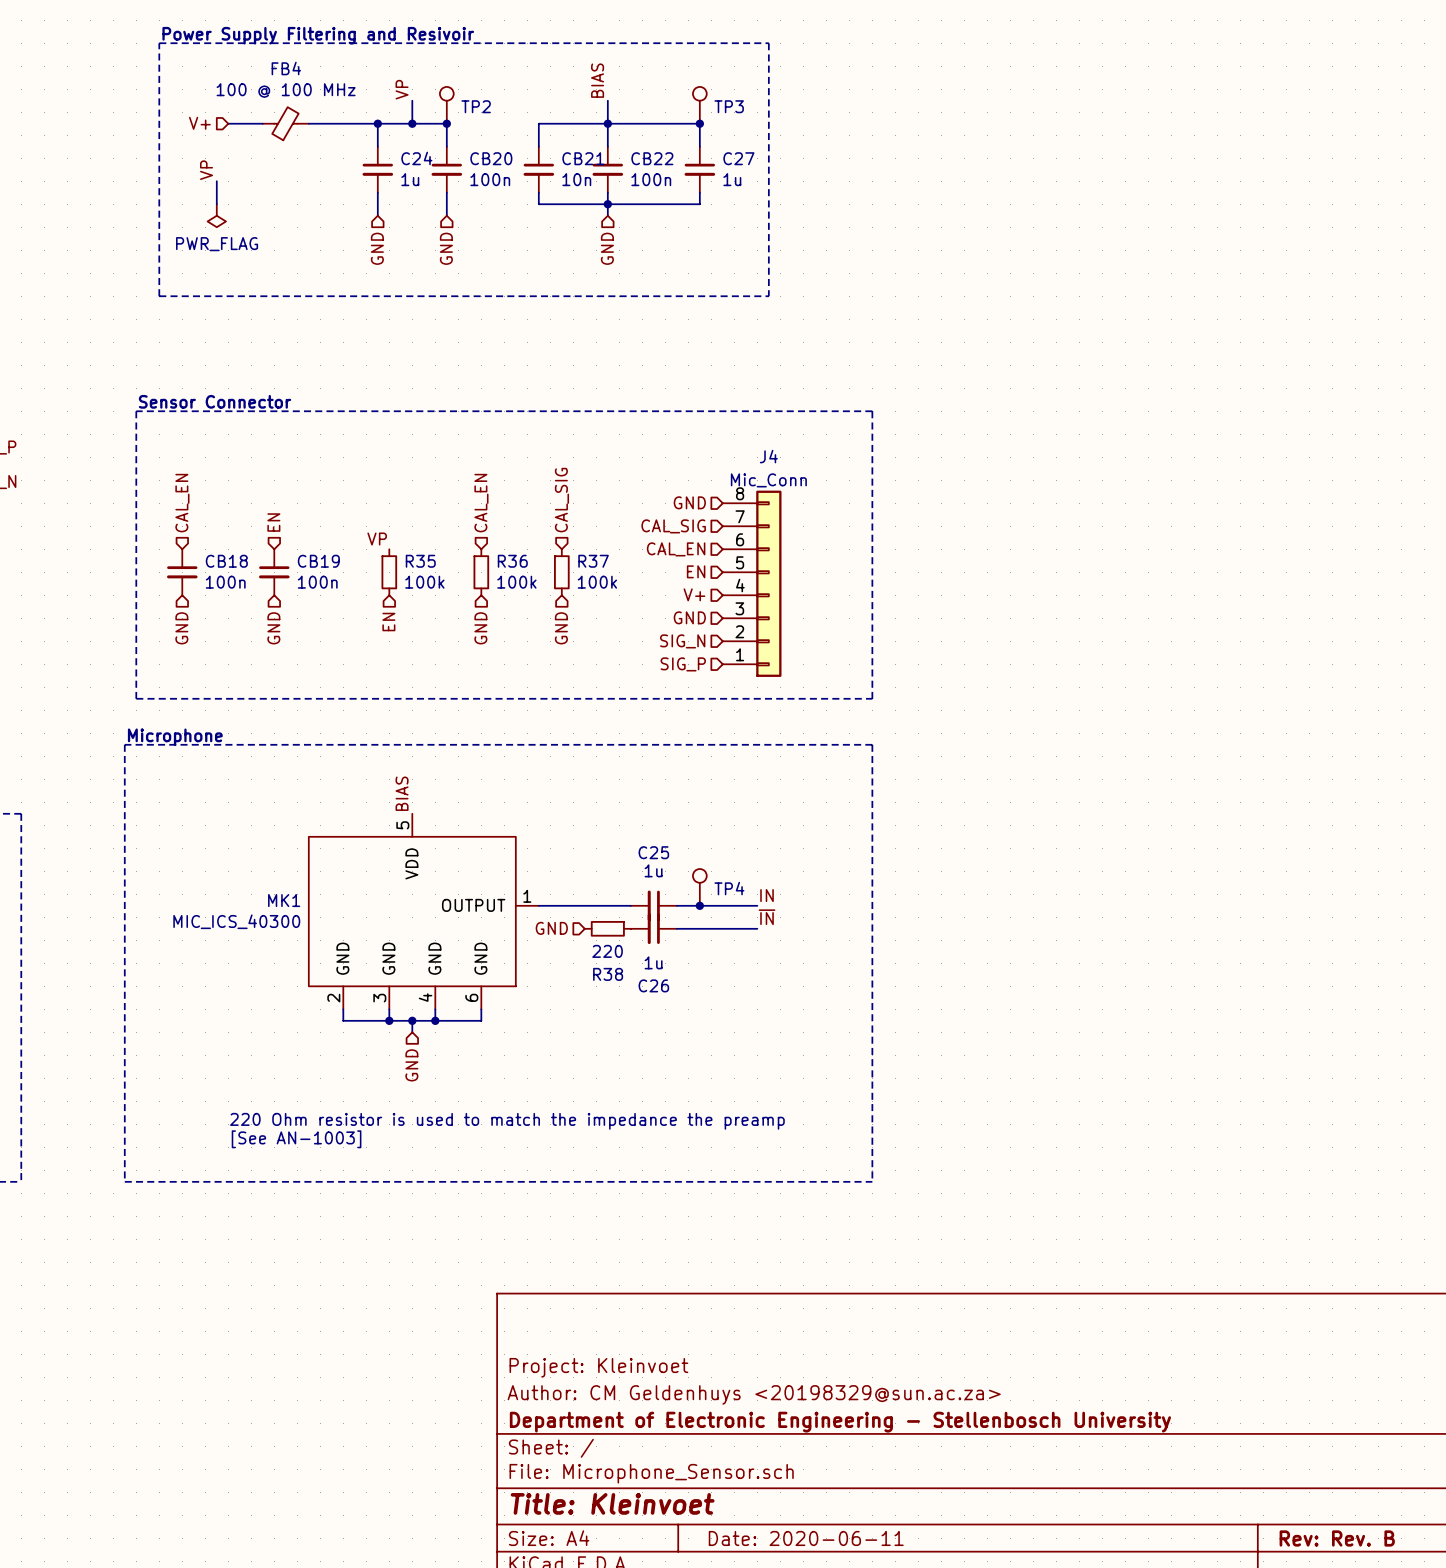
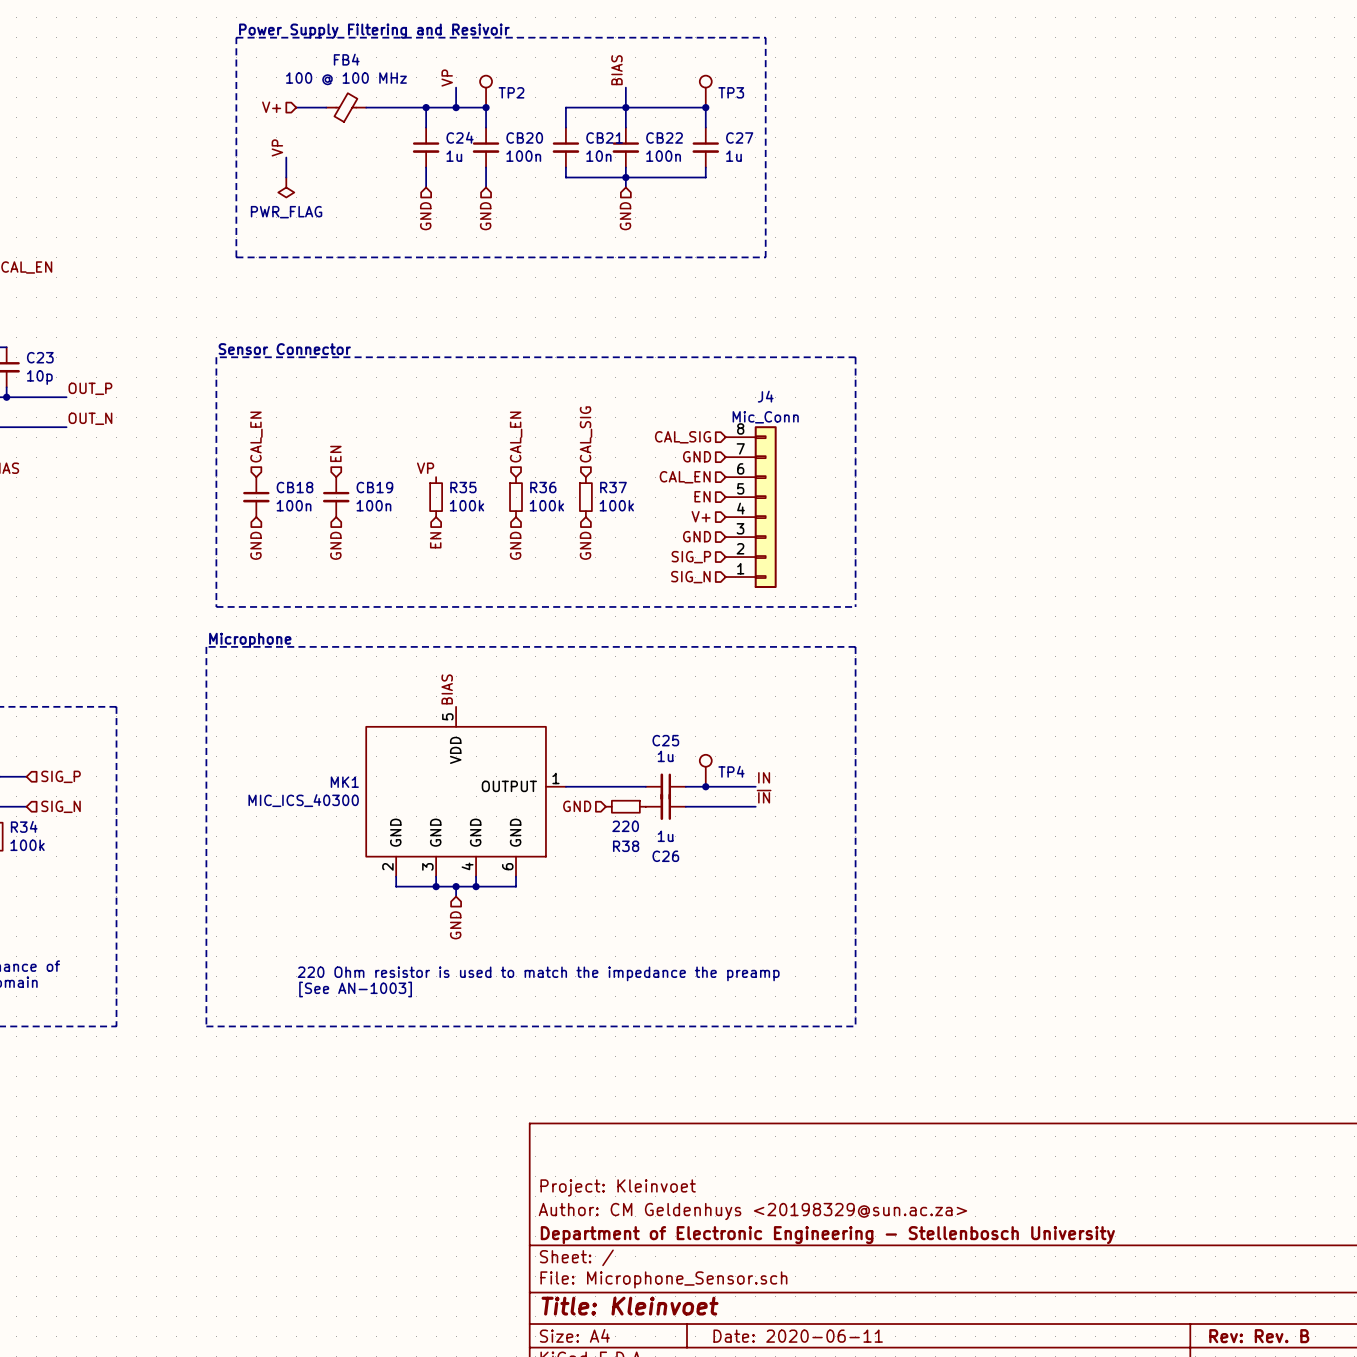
hierarchical label: GND (689, 502) -> CAL_SIG (683, 437)
hierarchical label: CAL_SIG (673, 526) -> GND (697, 456)
hierarchical label: SIG_N (682, 641) -> SIG_P (691, 557)
hierarchical label: SIG_P (683, 664) -> SIG_N (690, 577)

